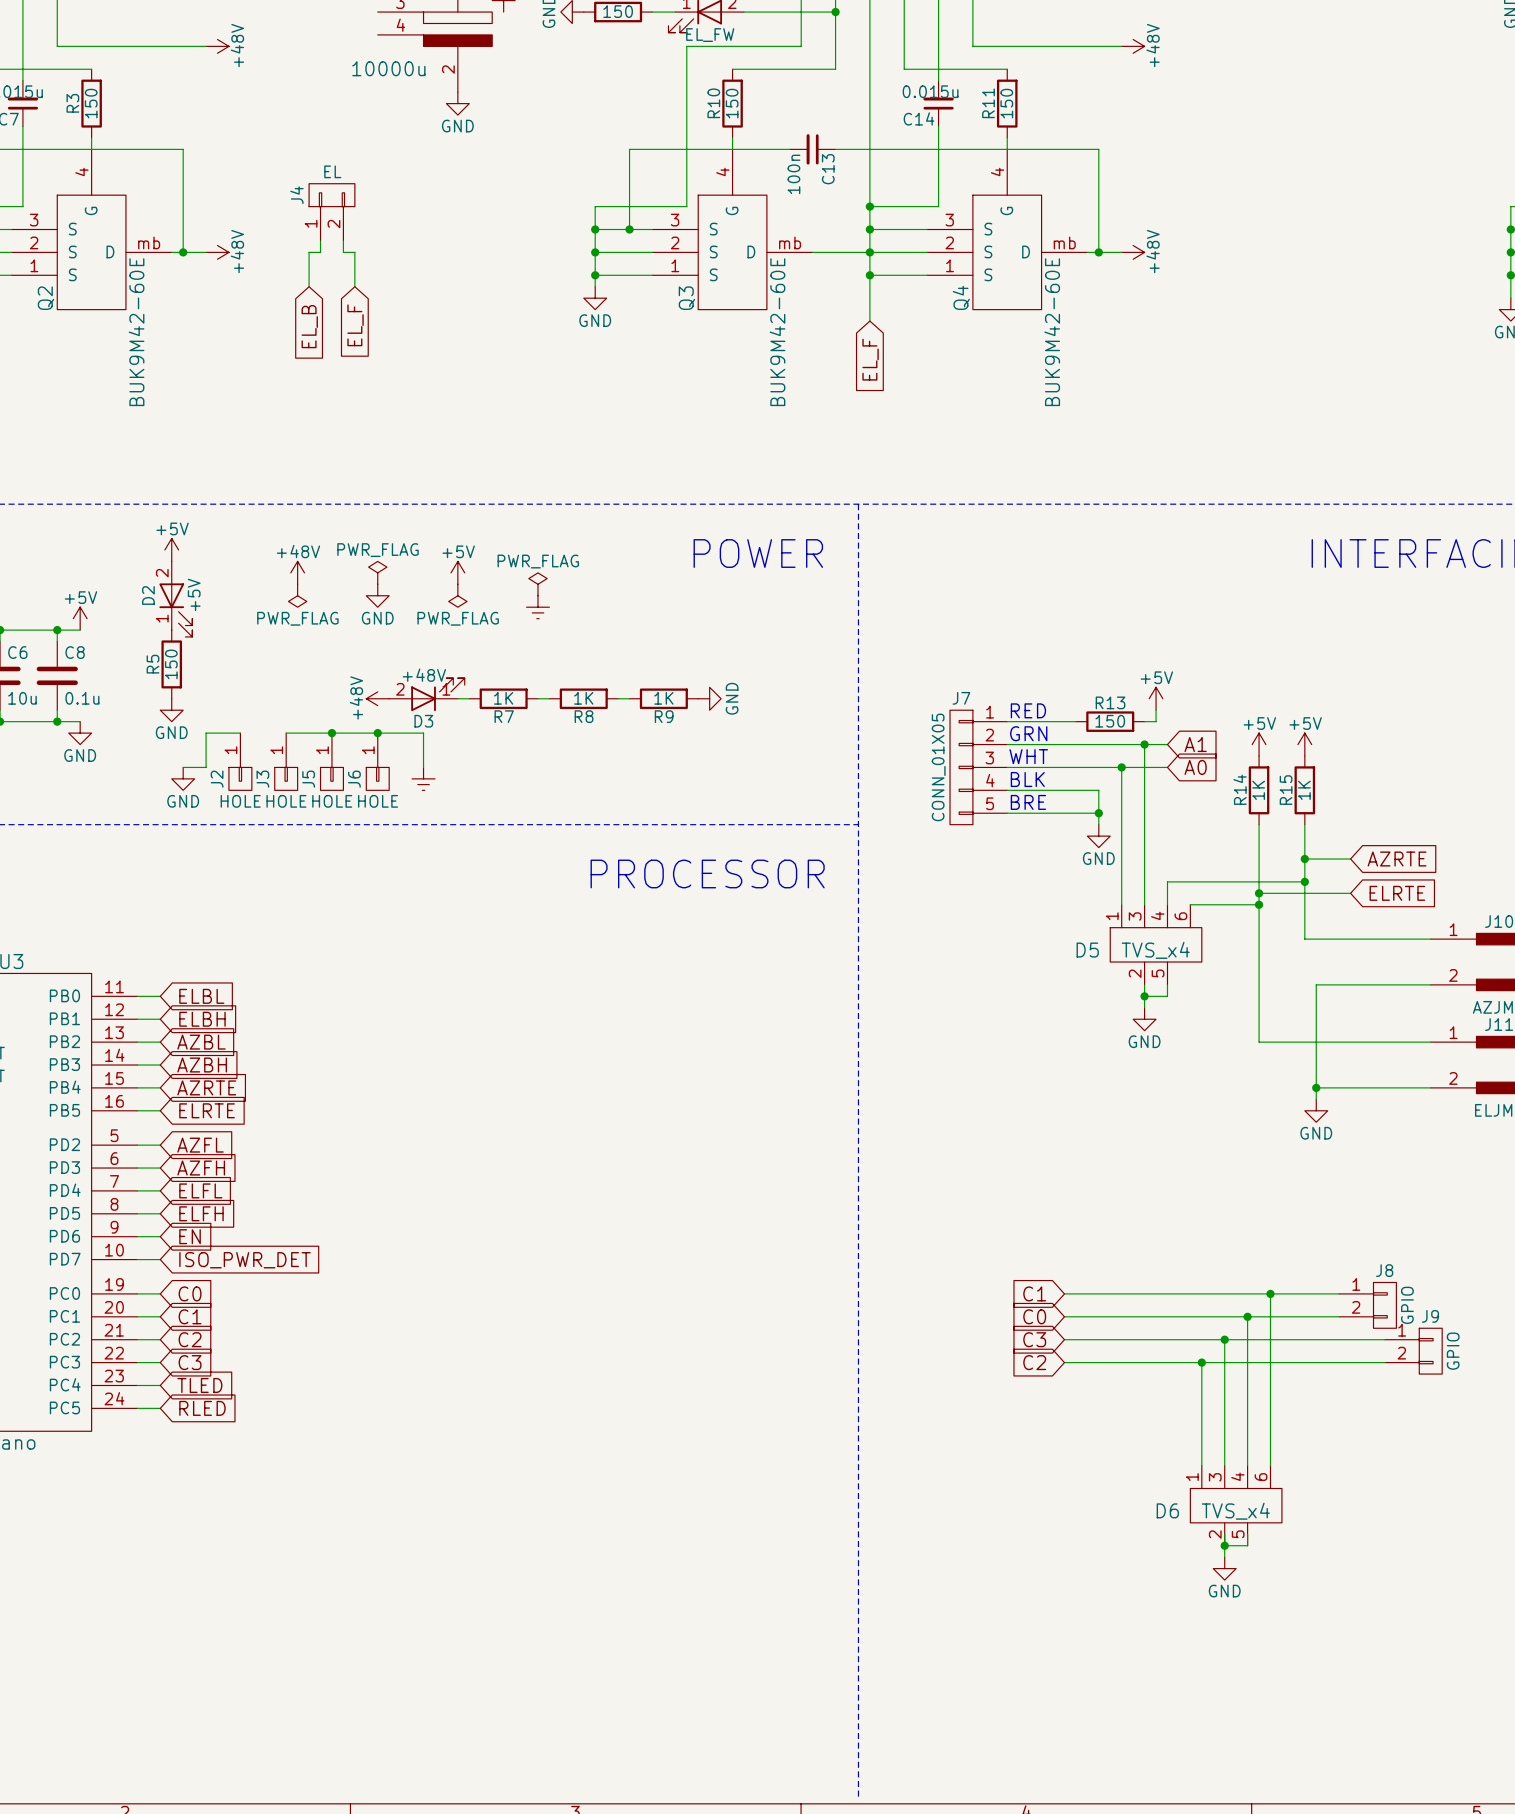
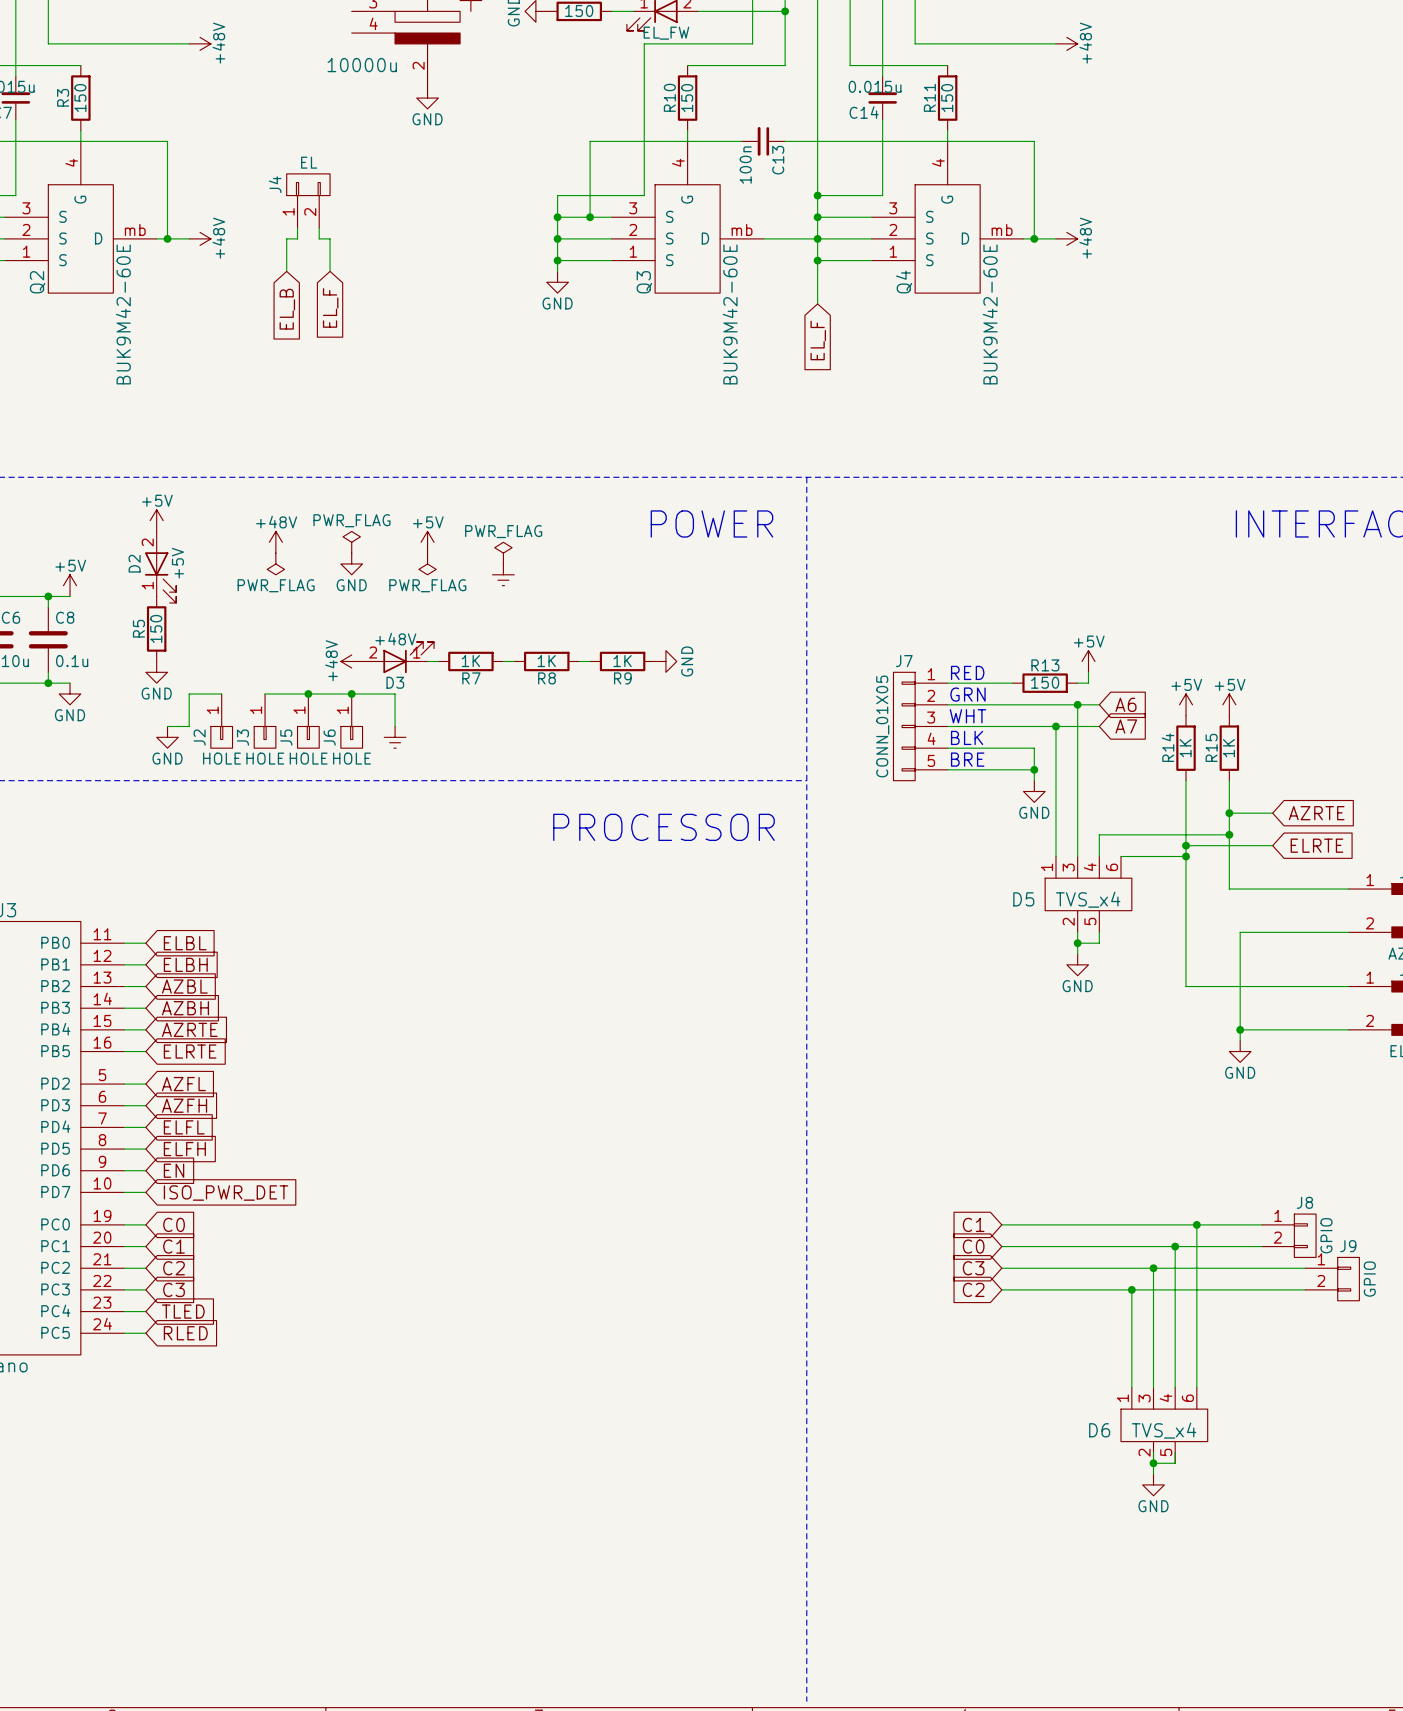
global label: A1 (1195, 744) -> A6 (1125, 704)
global label: A0 (1195, 767) -> A7 (1126, 726)

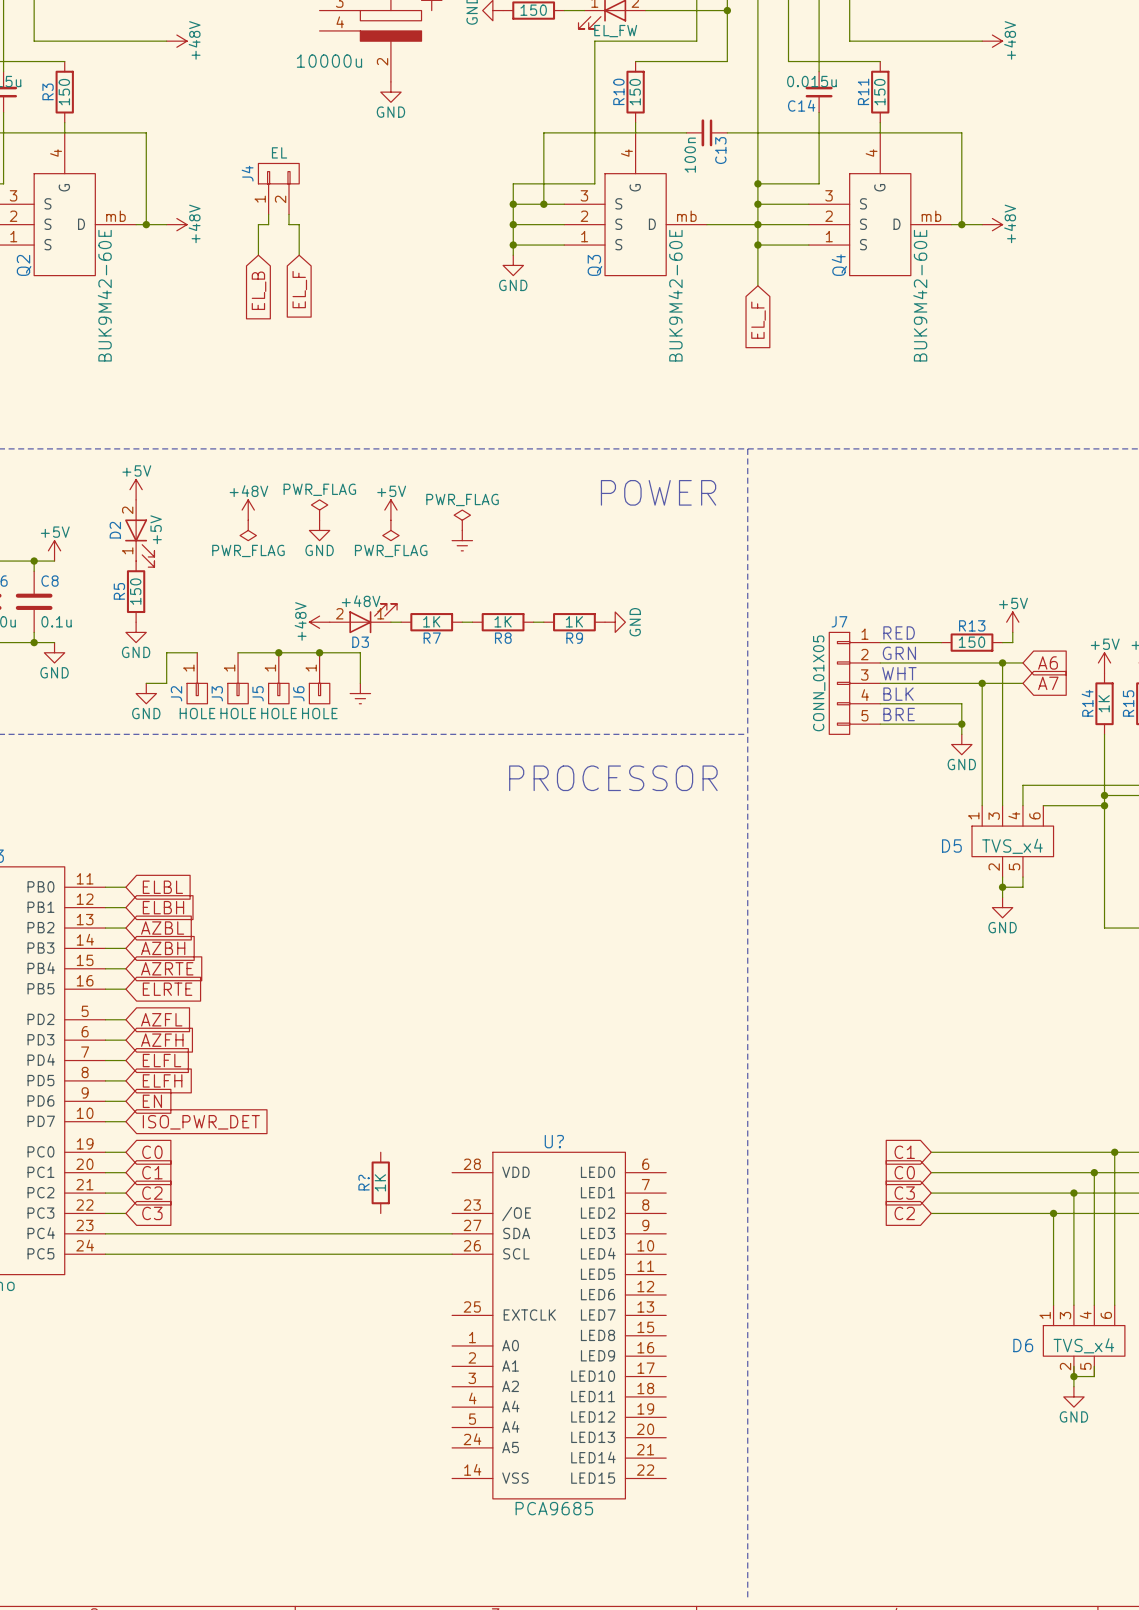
R?: none -> 1K (380, 1182)
wire: none -> (125, 1233) (452, 1233)
global label: TLED (183, 1311) -> none
wire: none -> (125, 1254) (452, 1254)
global label: RLED (185, 1333) -> none
U?: none -> PCA9685 (559, 1325)

